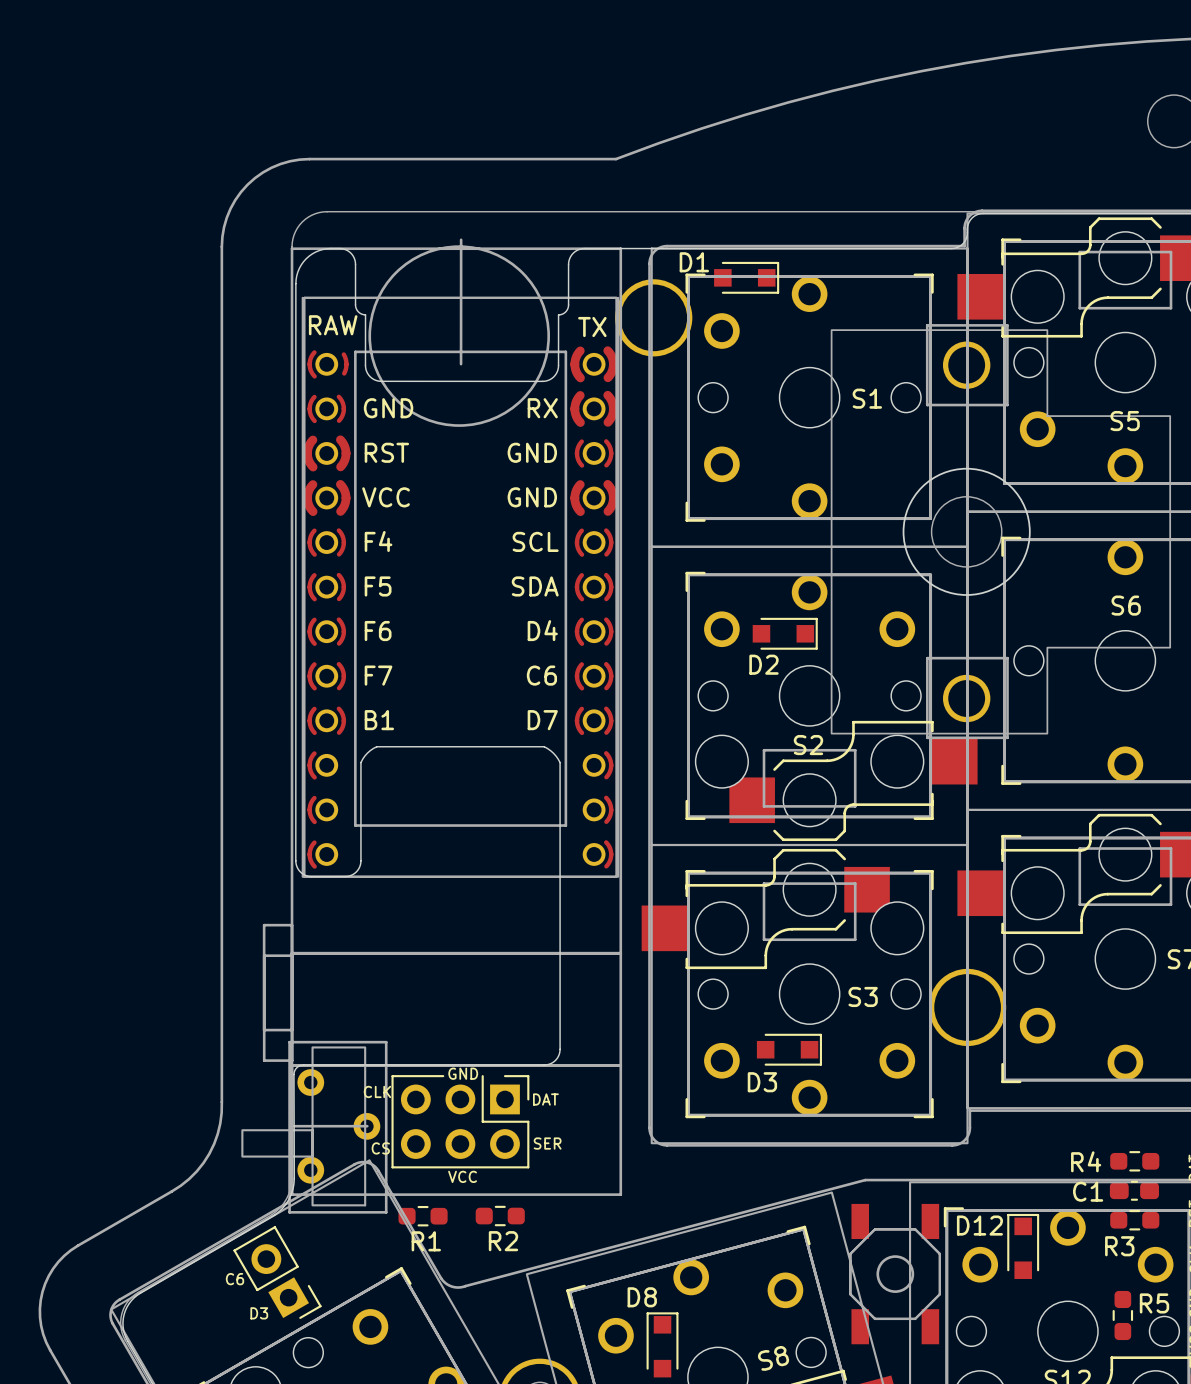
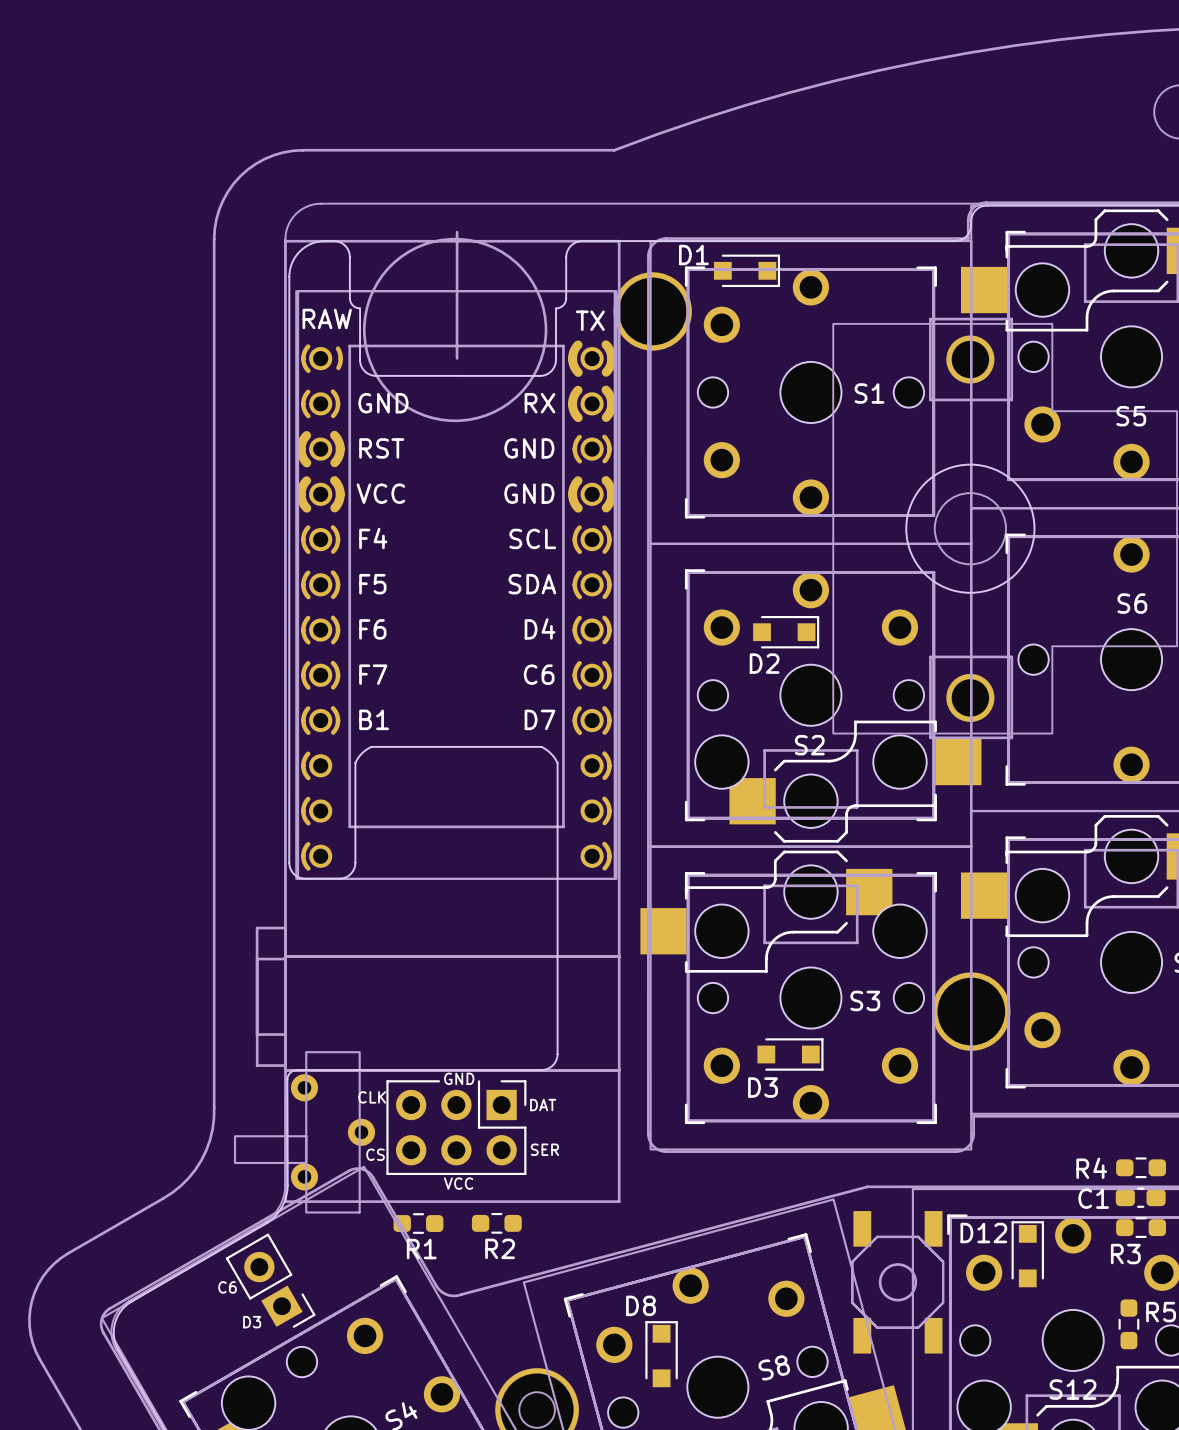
line: (289, 1042) (386, 1042) (386, 1212) (289, 1212) (289, 1042) -> none
line: (294, 1126) (367, 1126) -> none

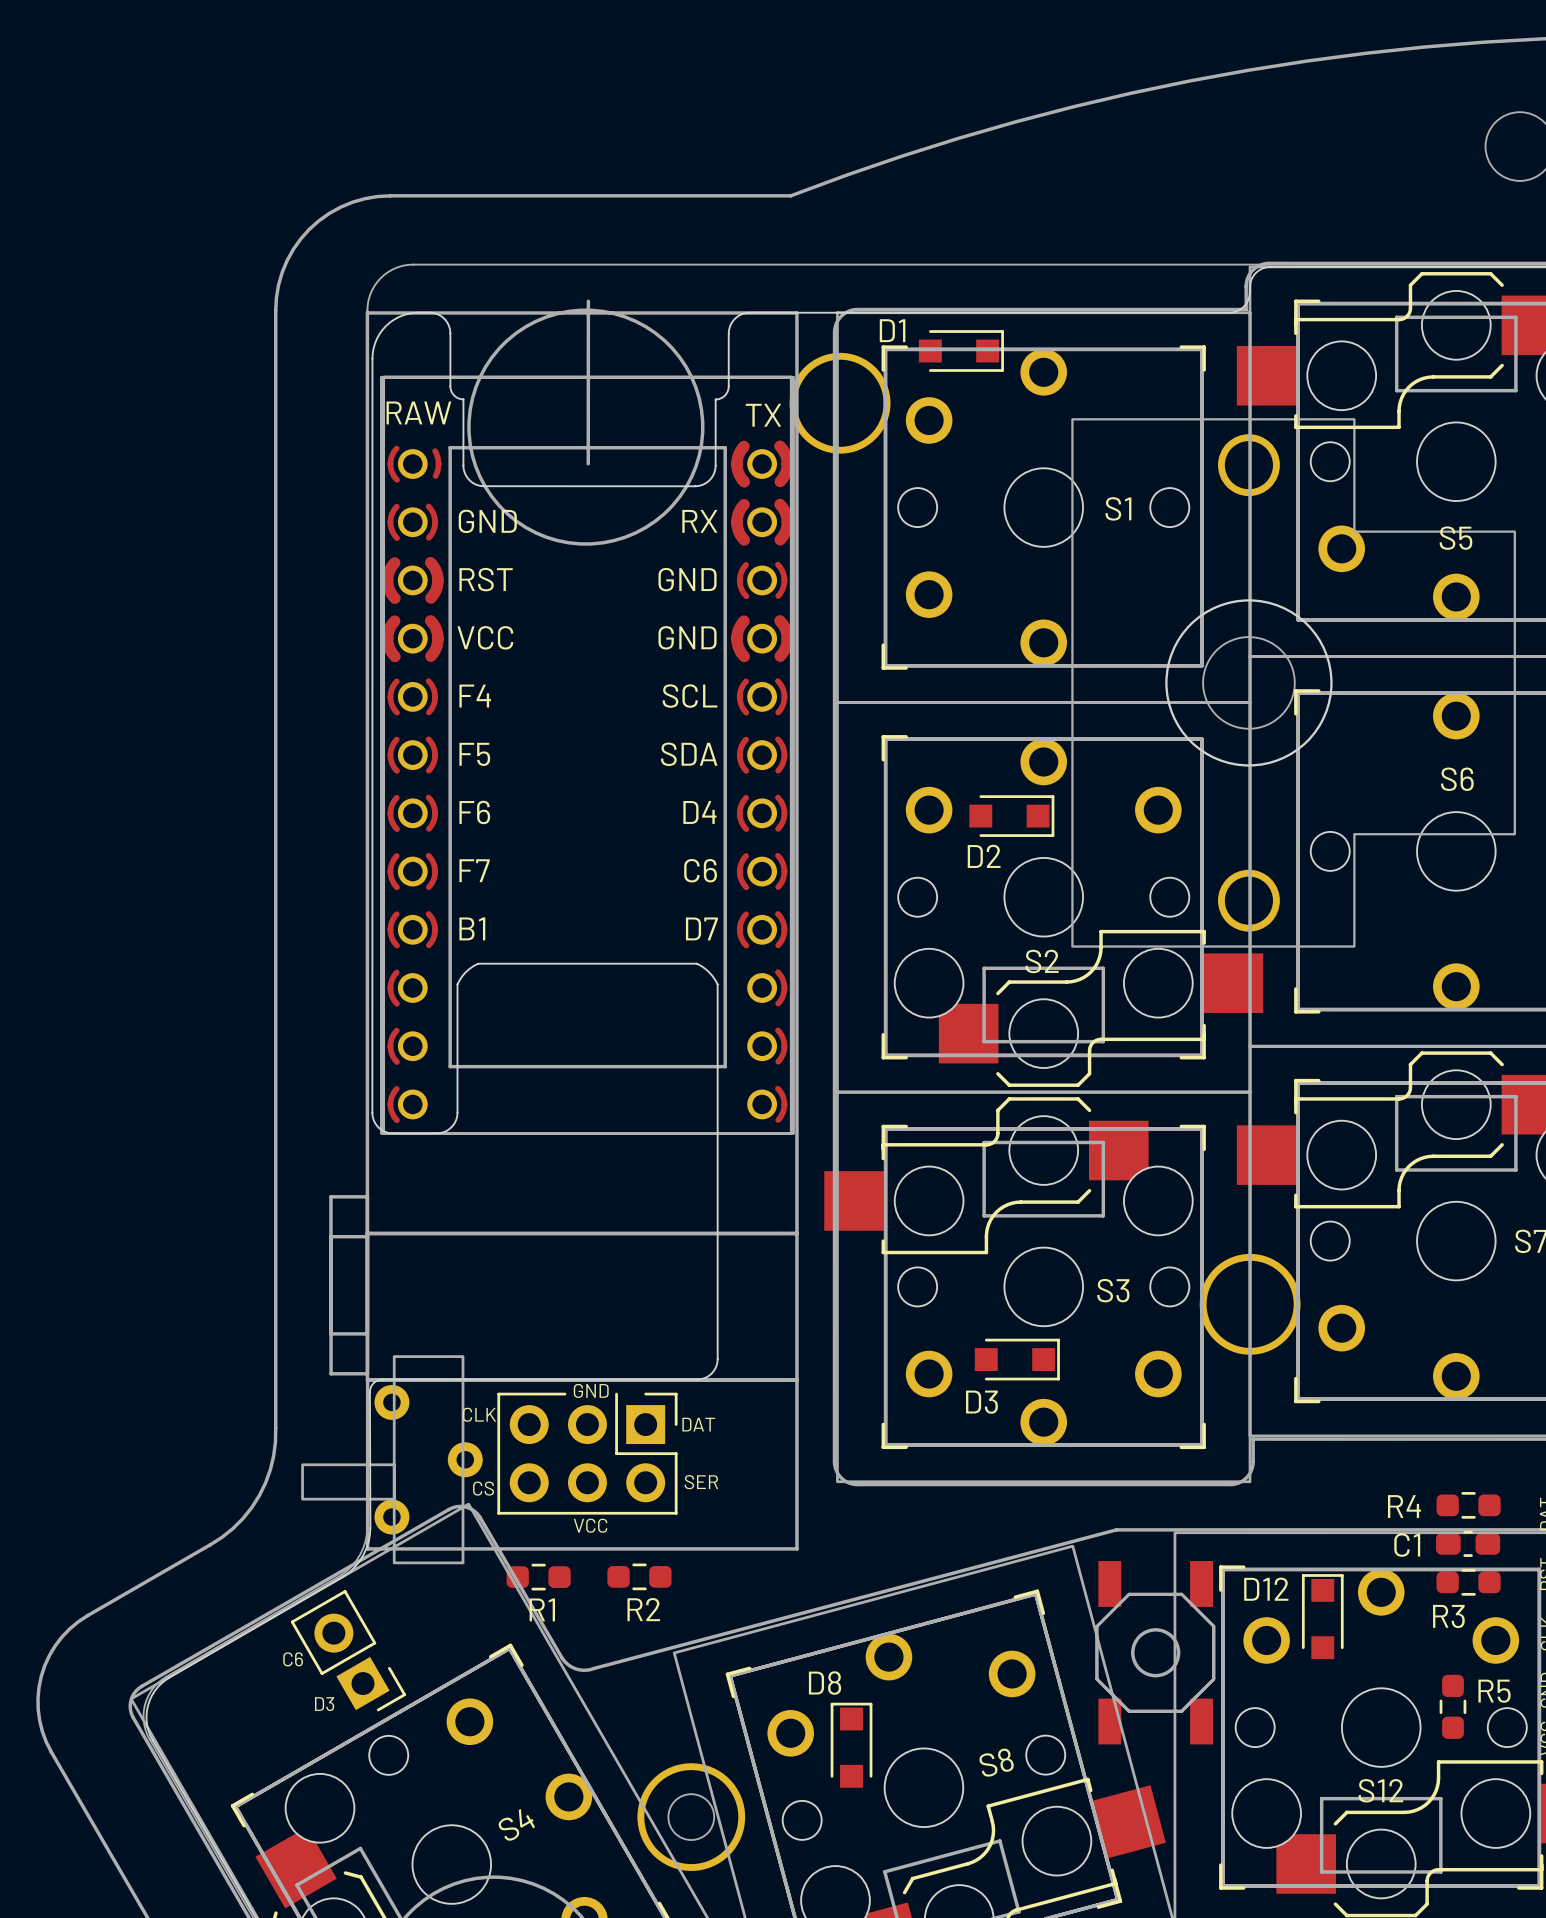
line: (930, 319) (930, 399) (1011, 399) (1011, 319) (930, 319) -> none
line: (930, 656) (1011, 656) (1011, 737) (930, 737) (930, 656) -> none

